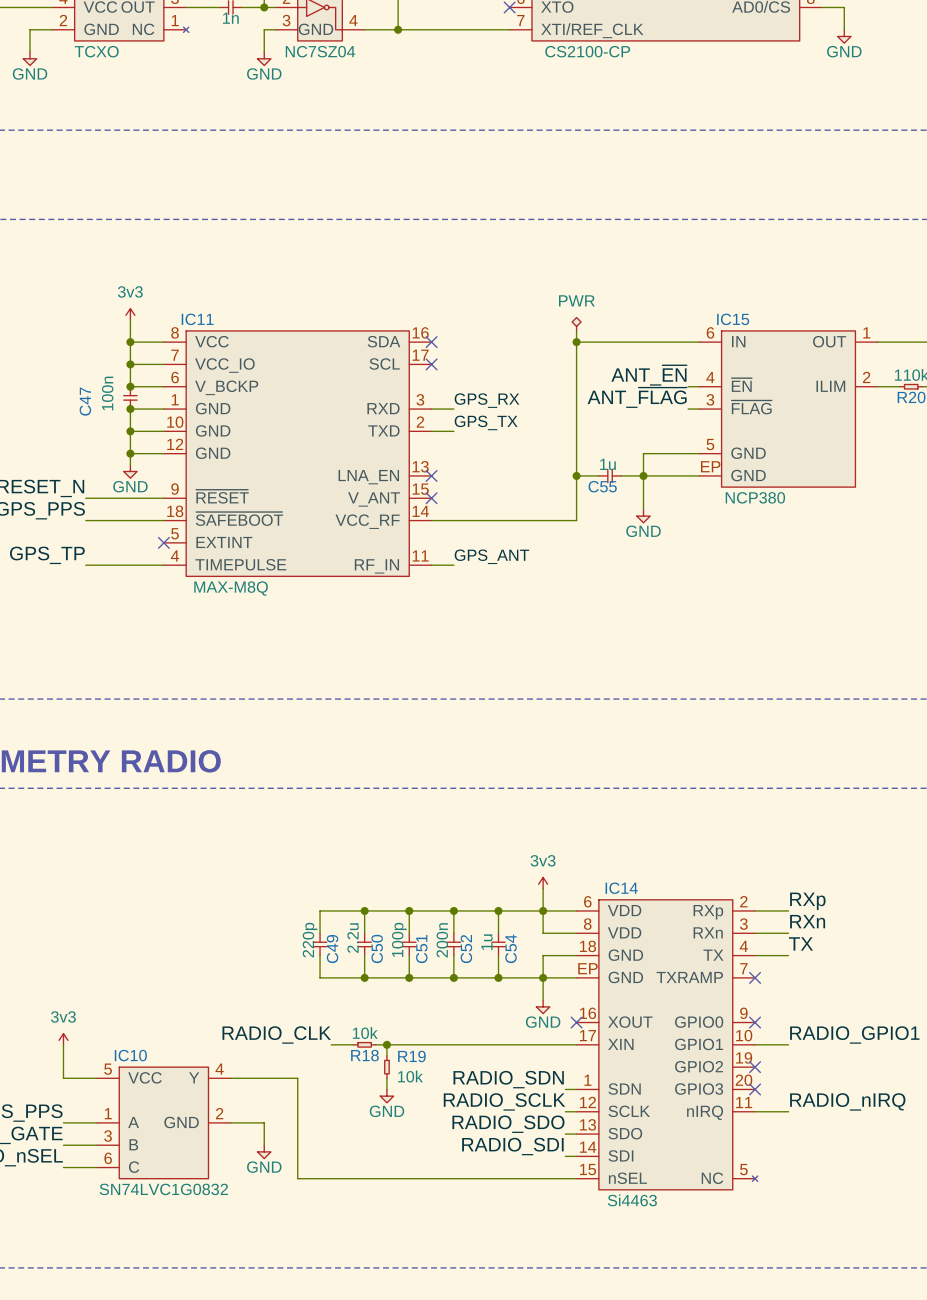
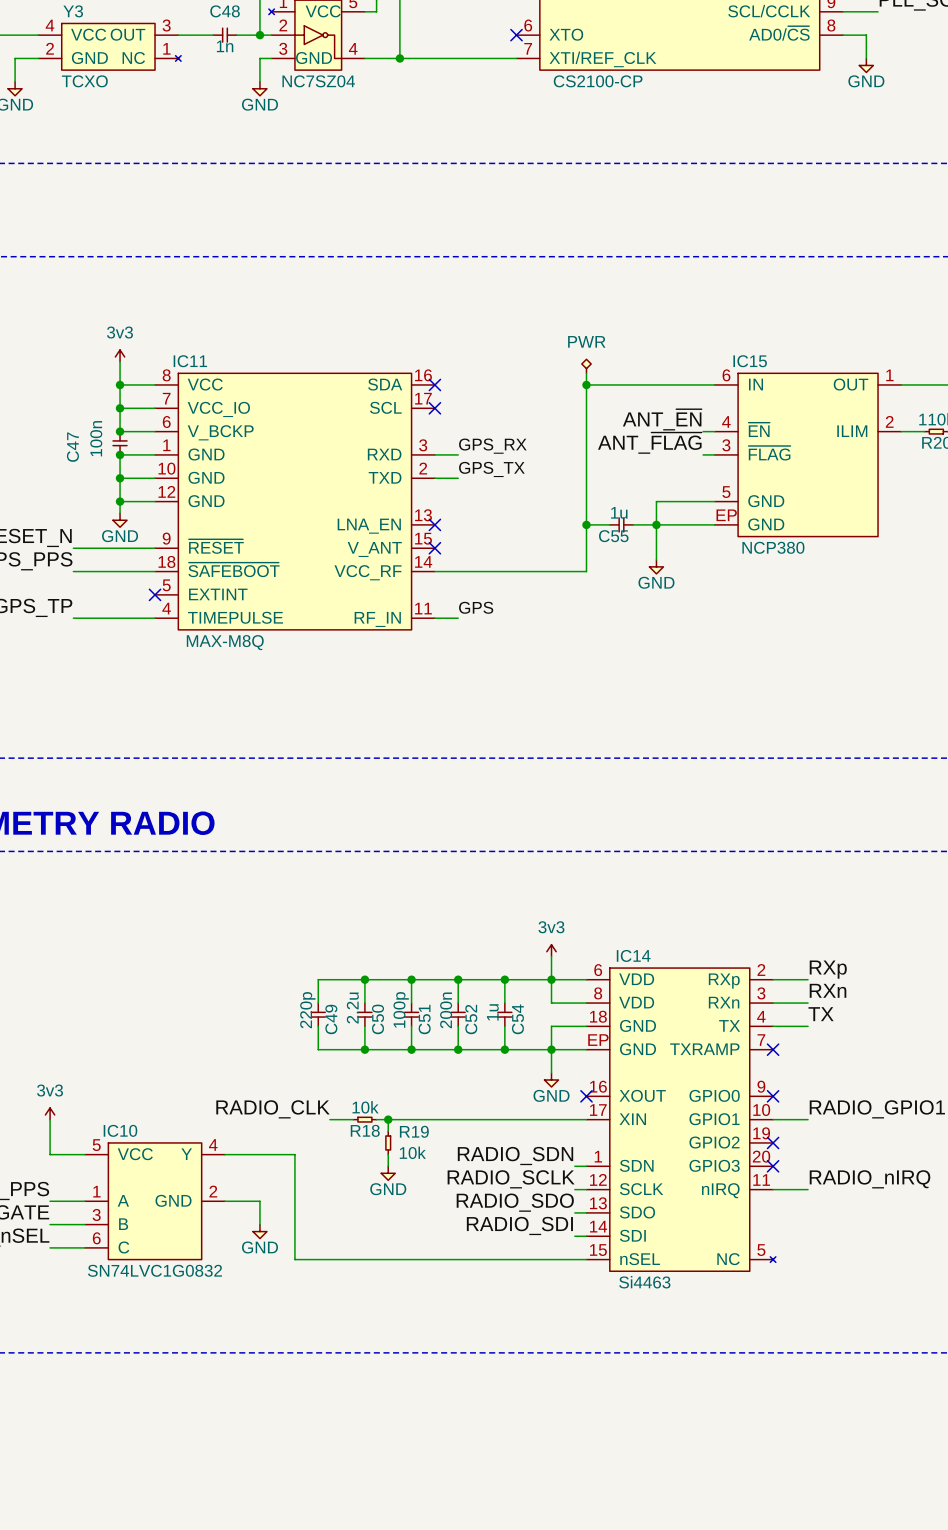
label: GPS_ANT (491, 556) -> GPS (476, 607)

